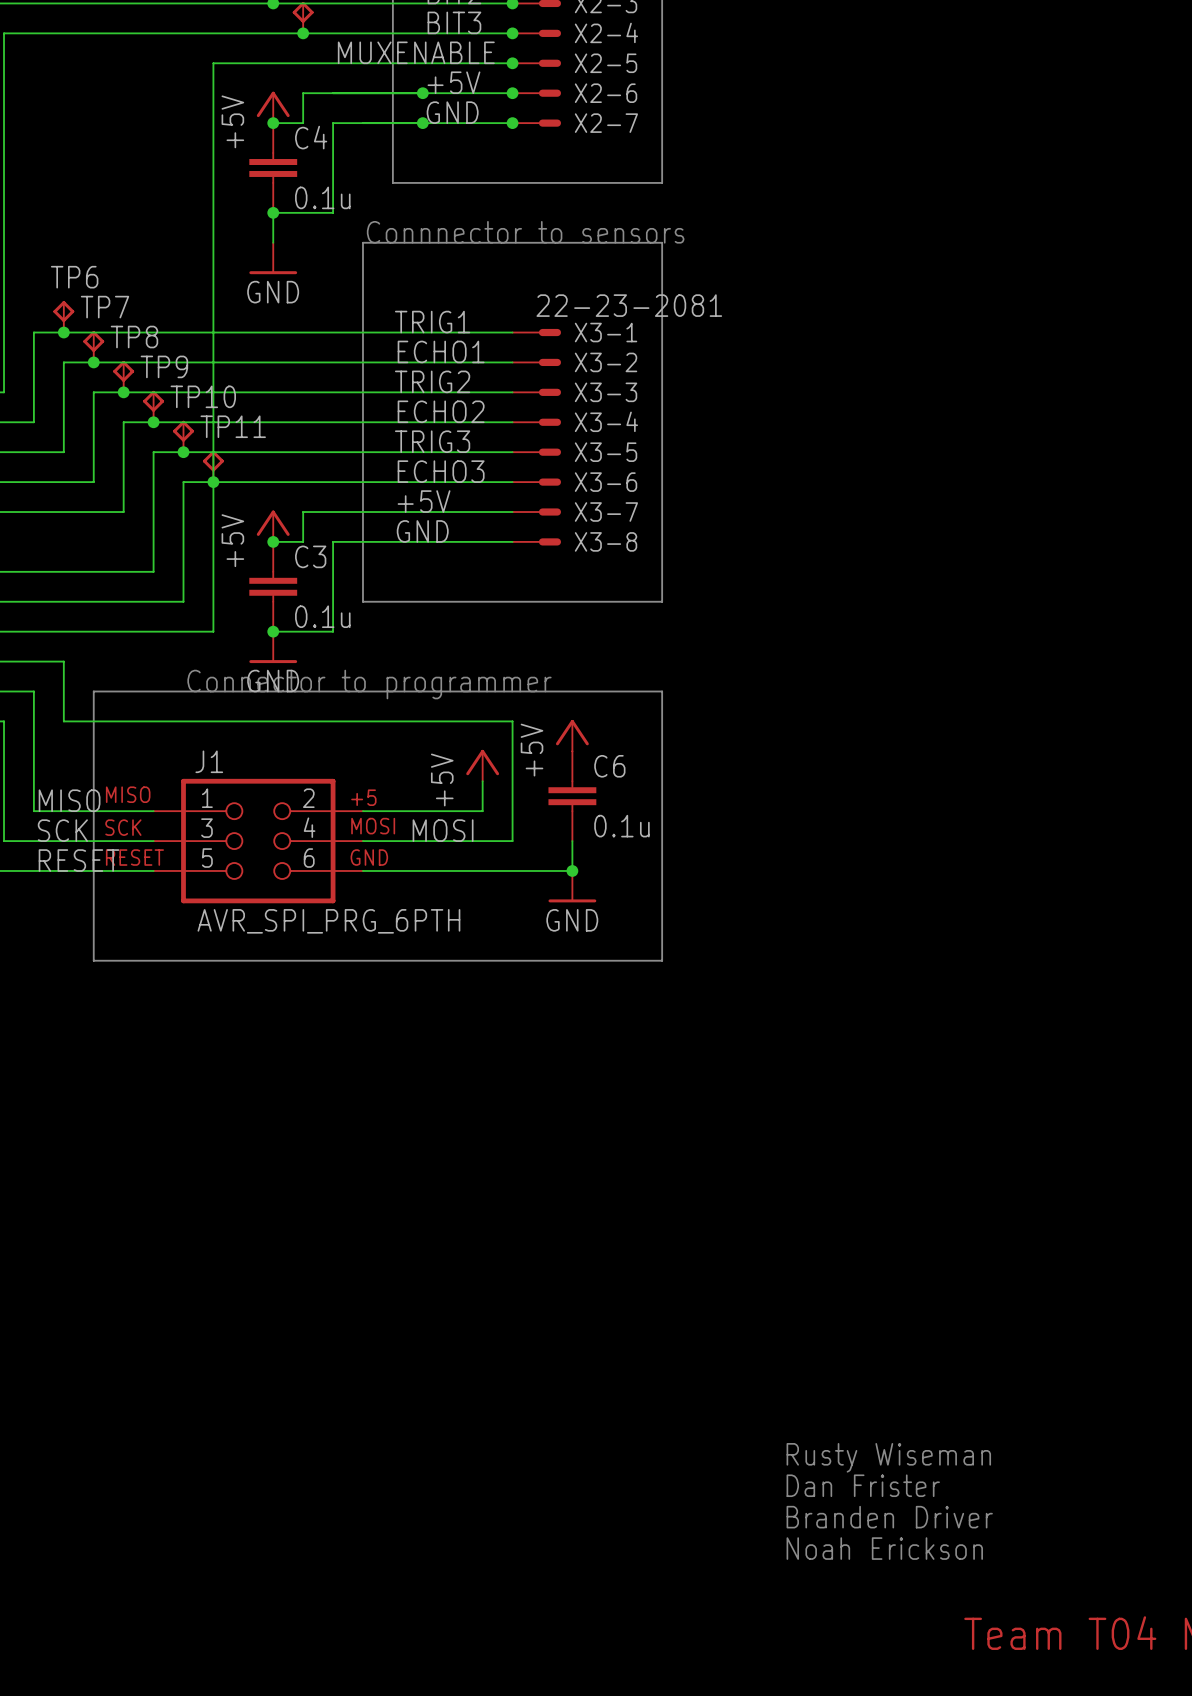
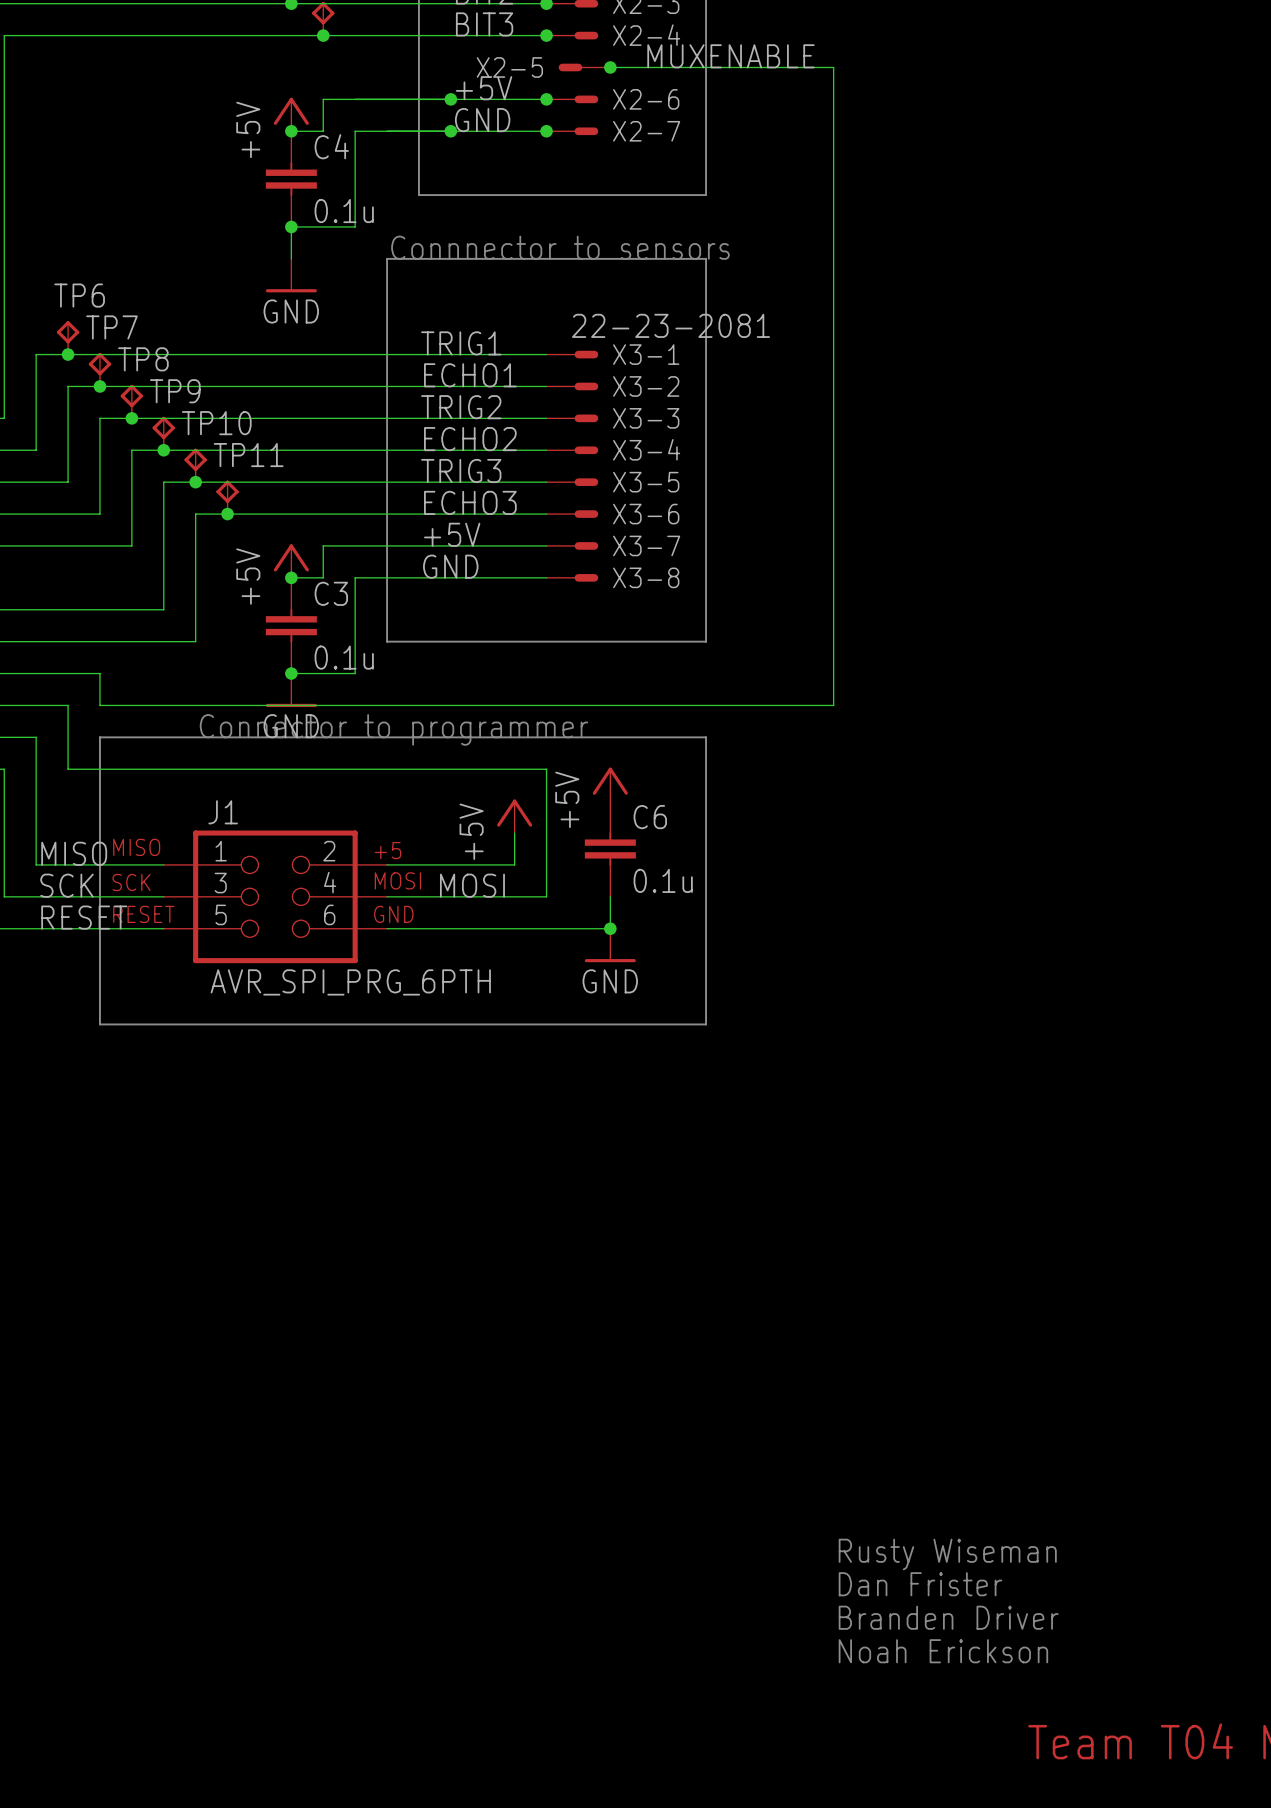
label position: MUXENABLE (416, 52) -> MUXENABLE (730, 56)
wire: (512, 63) (213, 63) (213, 631) (93, 631) -> (610, 67) (833, 67) (833, 705) (99, 705) (99, 673)
junction position: (512, 63) -> (610, 67)
X2-5 rotation: 0° (549, 63) -> 180° (570, 67)

